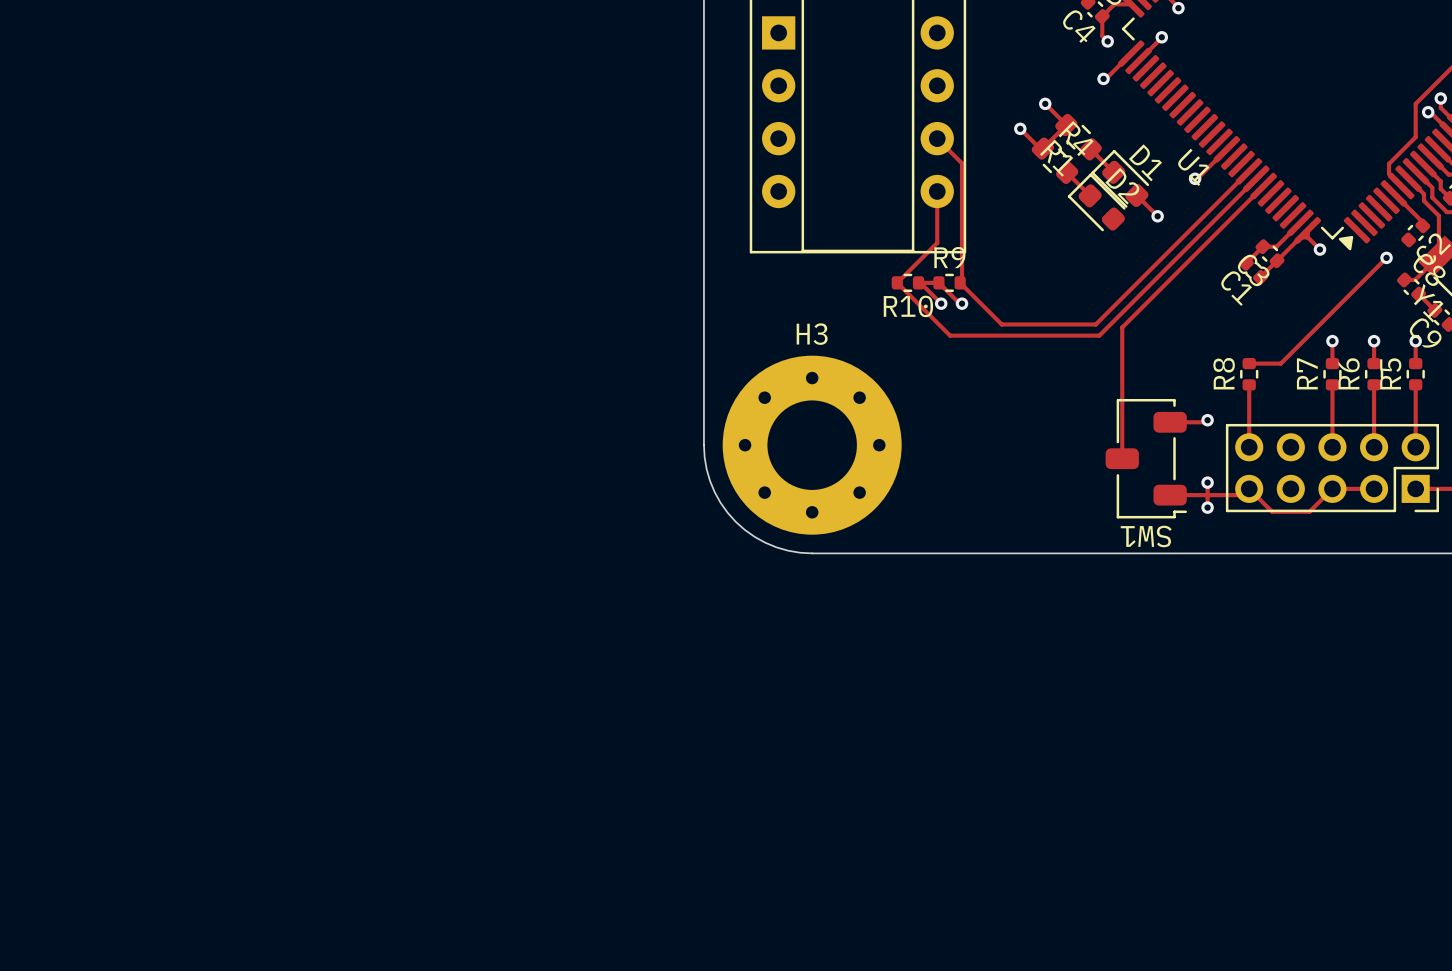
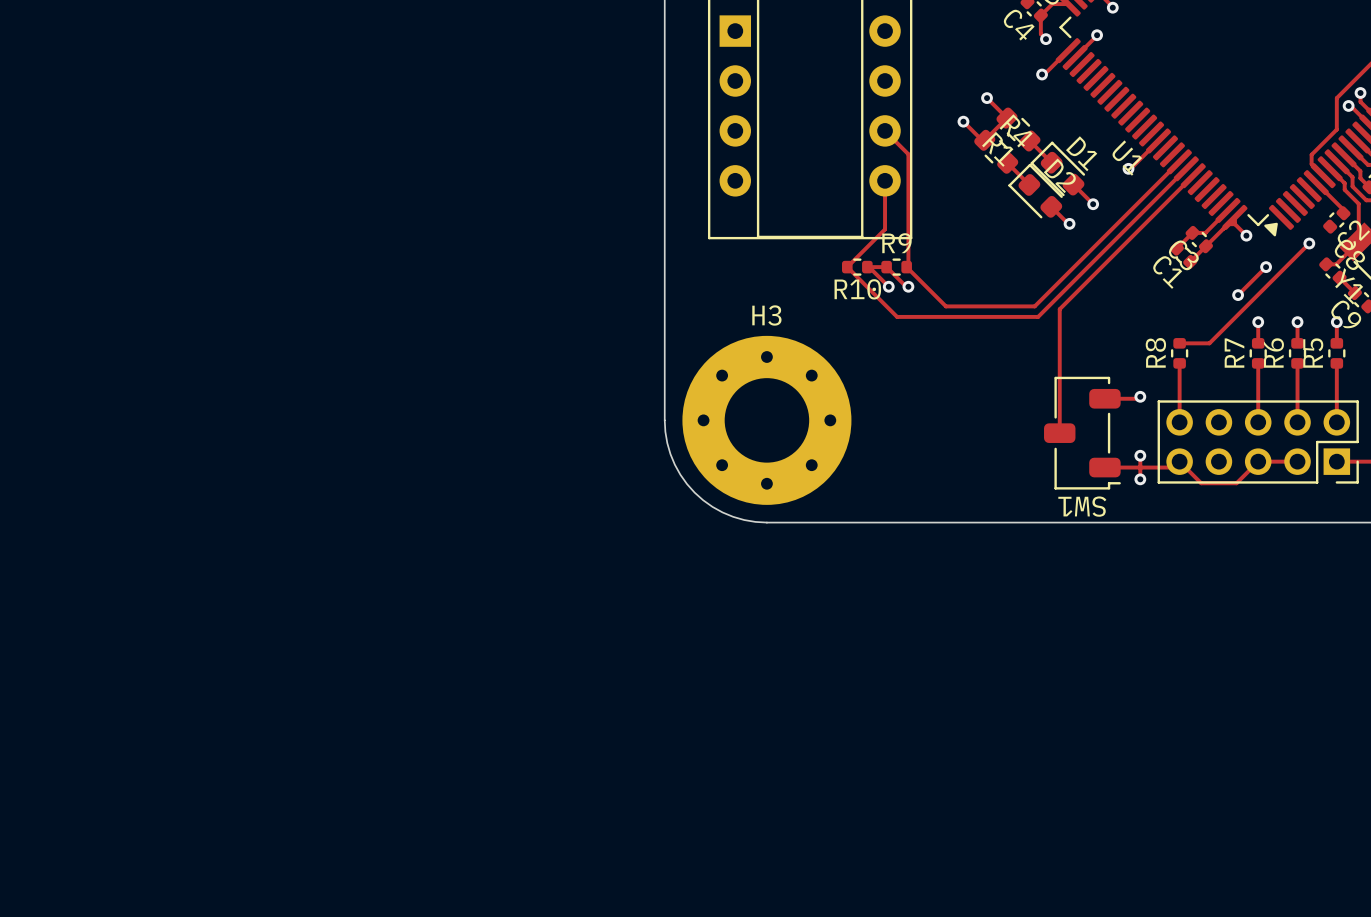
track: none -> (1051, 206) (1069, 223)
via: none -> (1069, 223)
track: none -> (1266, 267) (1238, 295)
via: none -> (1266, 267)
via: none -> (1238, 295)

